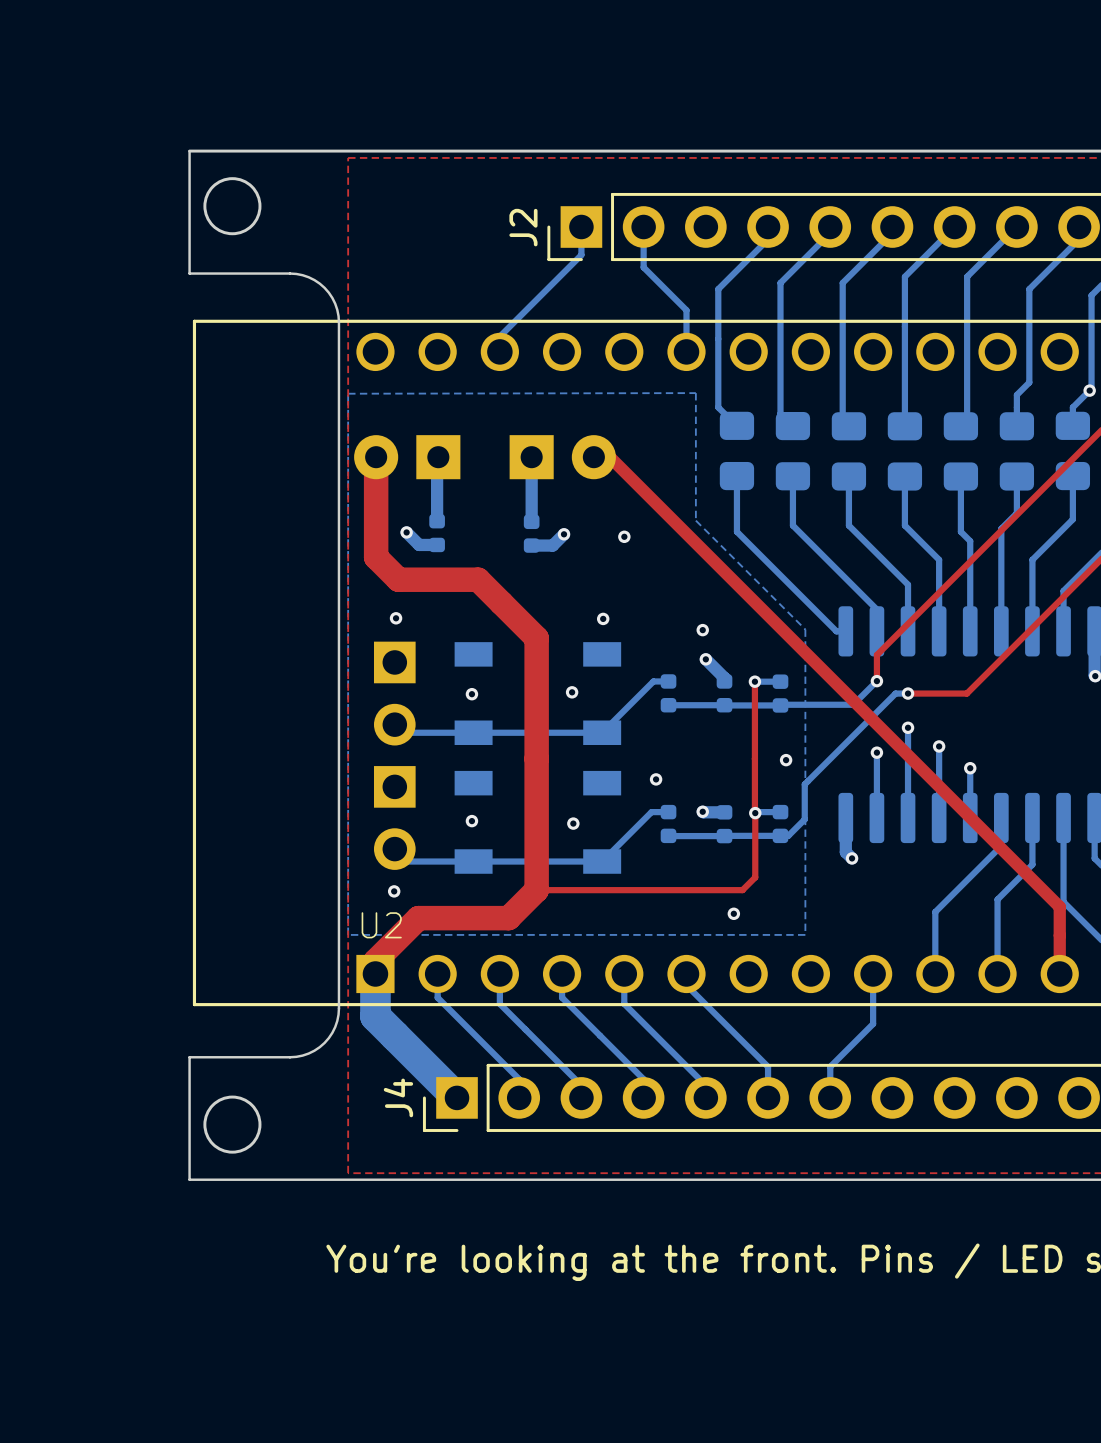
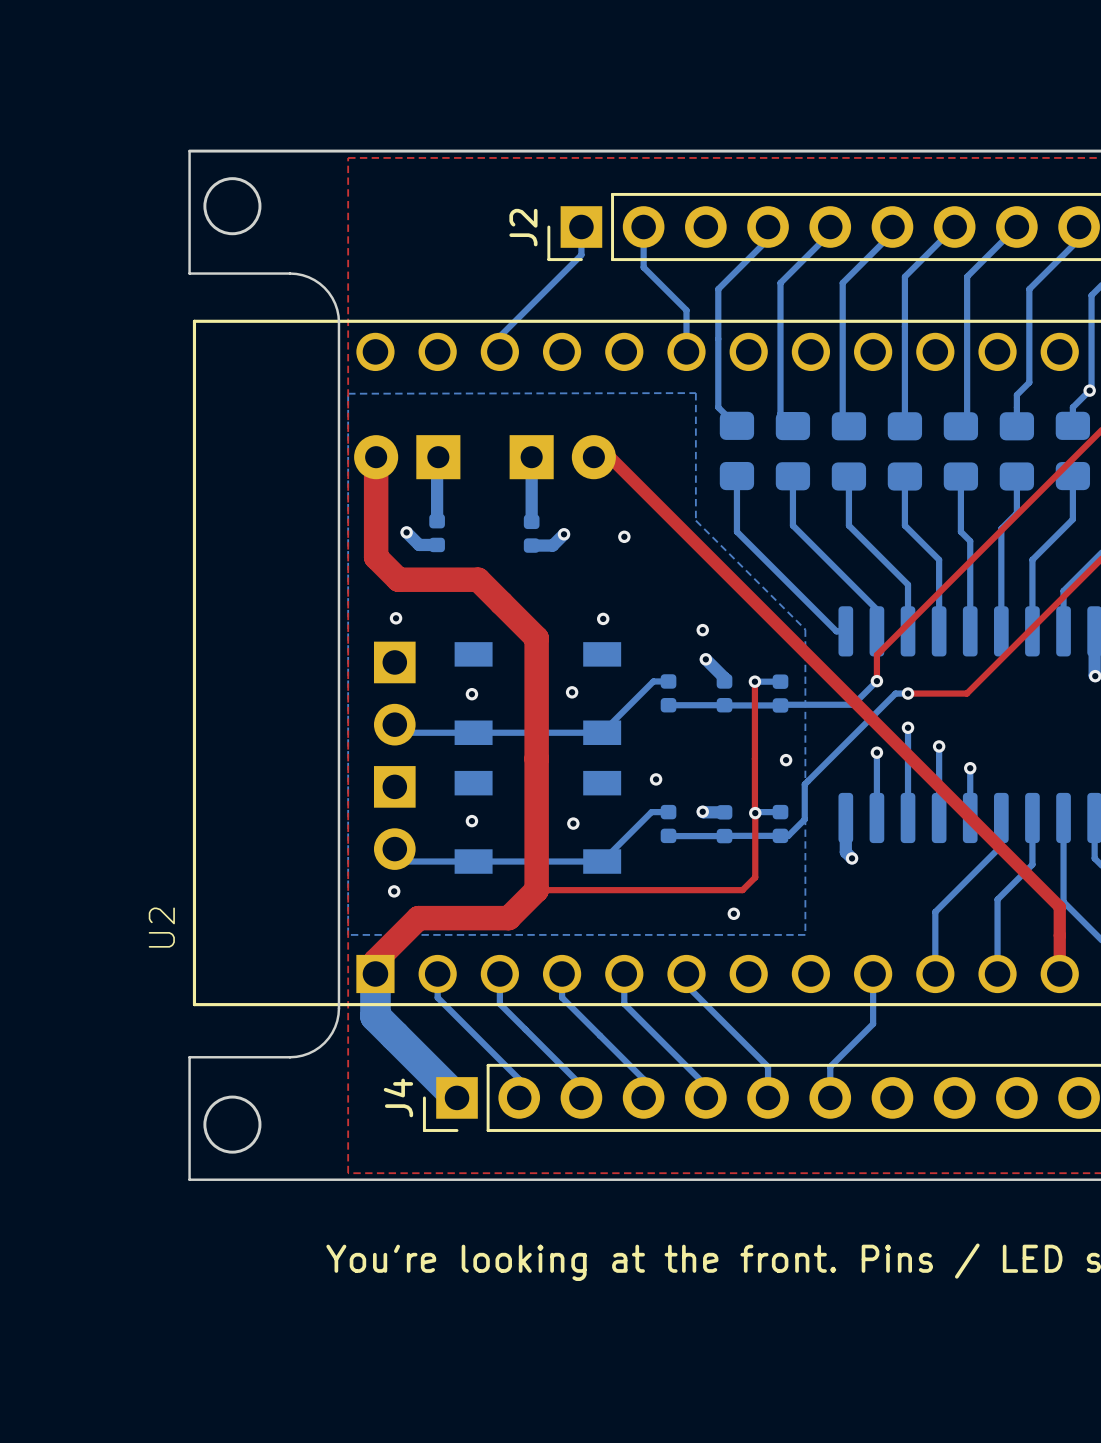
U2 name rotation: 0° (381, 925) -> 90° counterclockwise (161, 927)
U2 name position: U2 (381, 925) -> U2 (161, 927)

